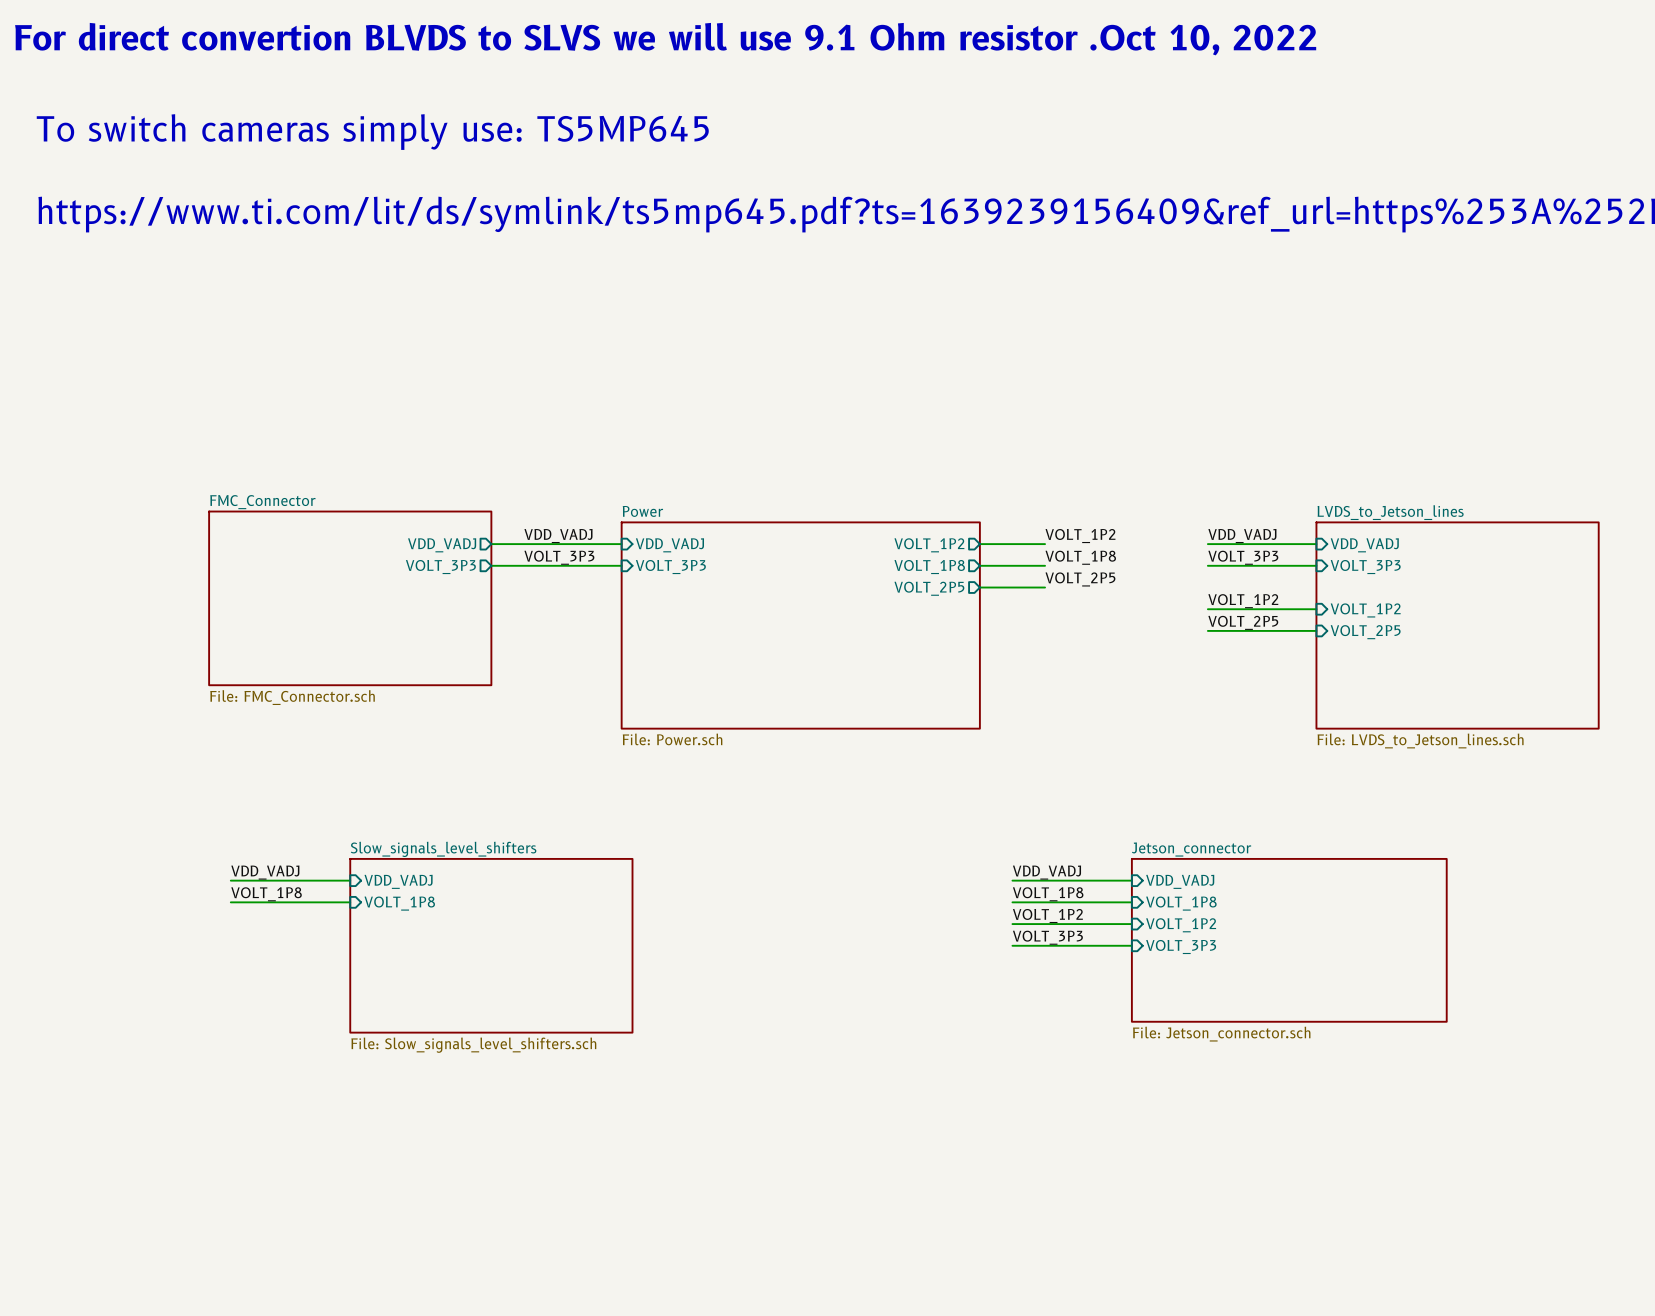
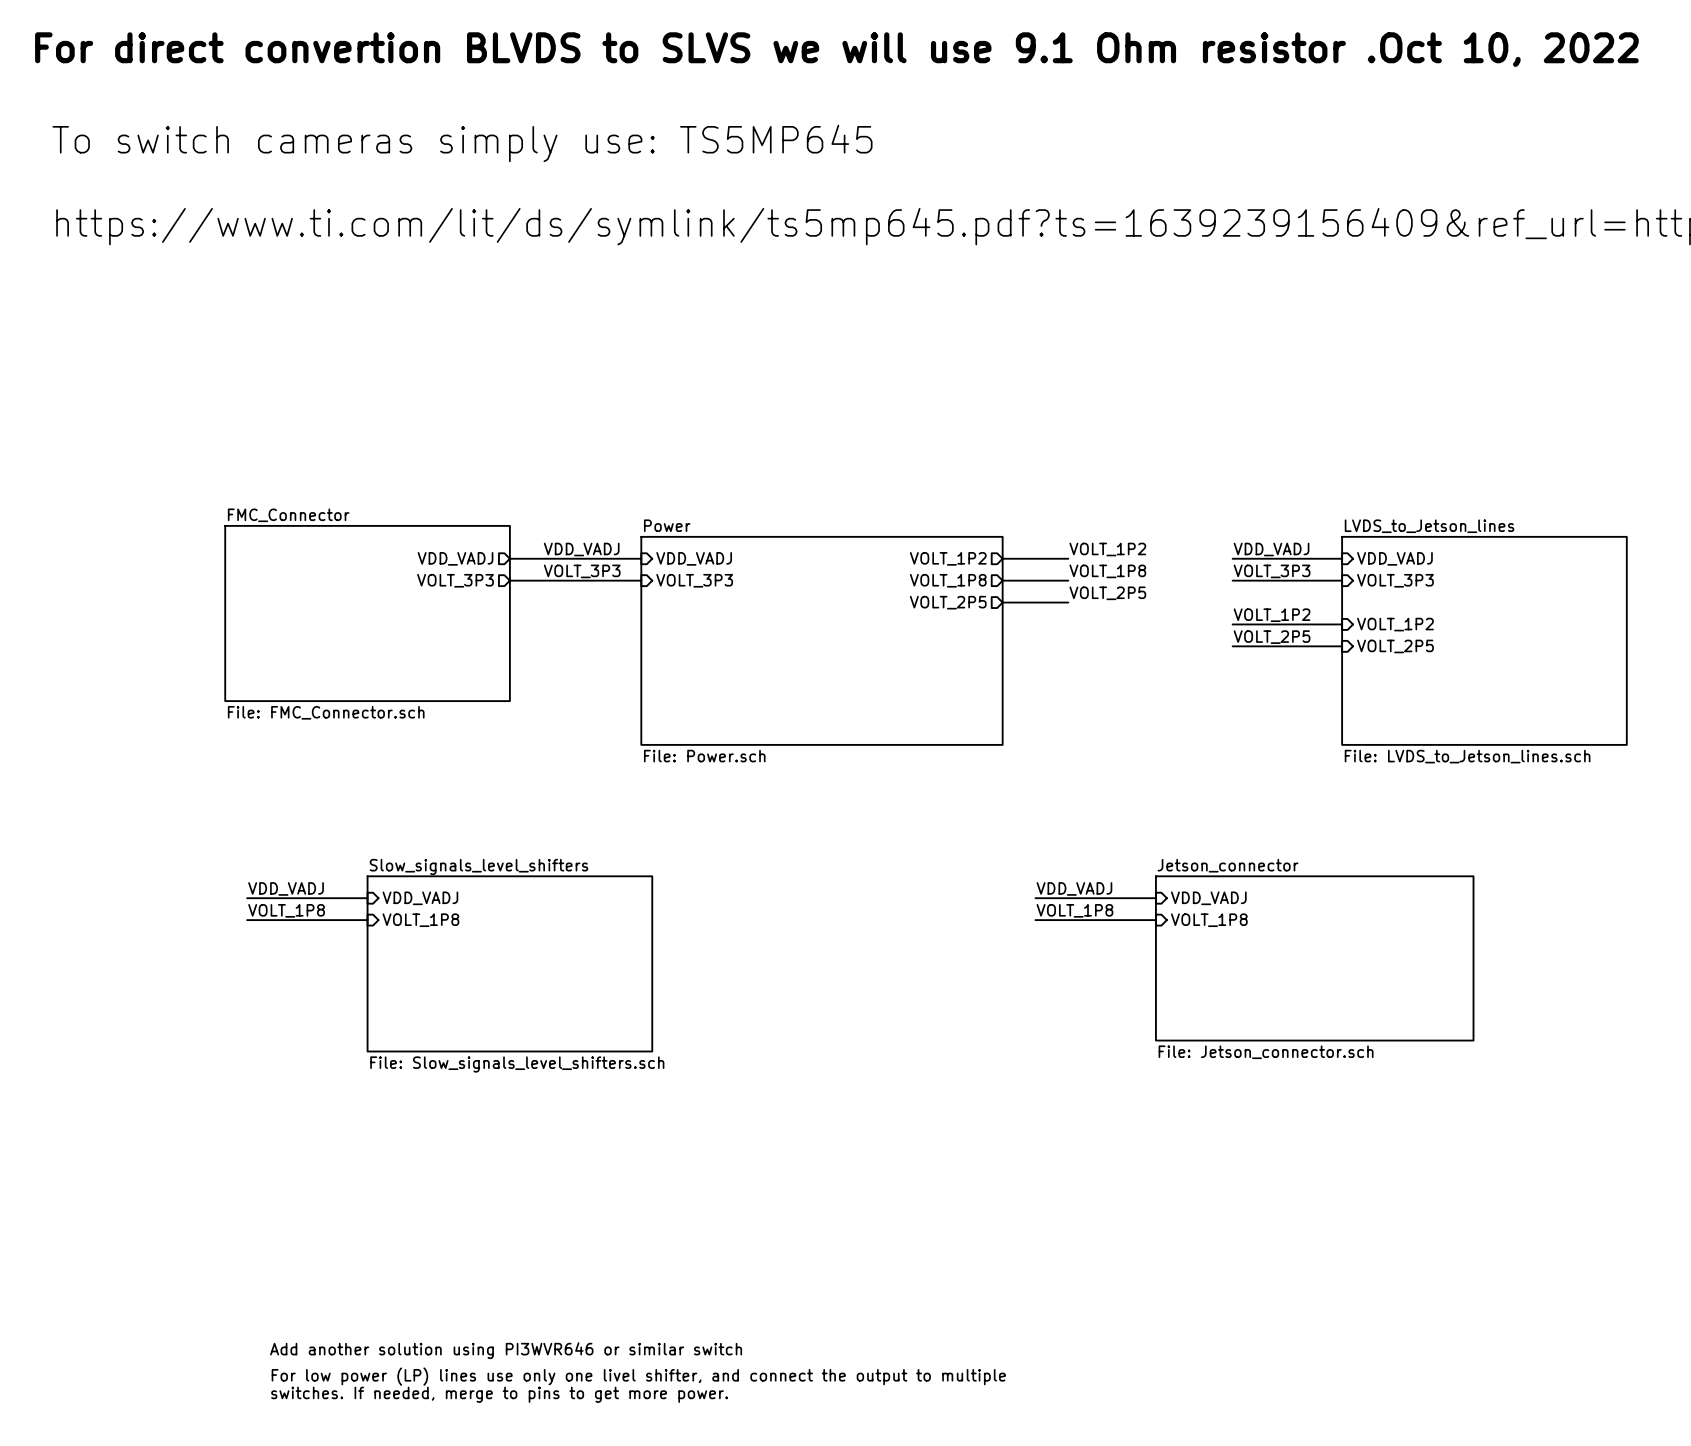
label: VOLT_1P2 (1047, 916) -> none
wire: (1012, 924) (1131, 924) -> none
sheet pin: VOLT_1P2 (1181, 925) -> none
label: VOLT_3P3 (1047, 937) -> none
wire: (1012, 945) (1131, 945) -> none
sheet pin: VOLT_3P3 (1181, 946) -> none

